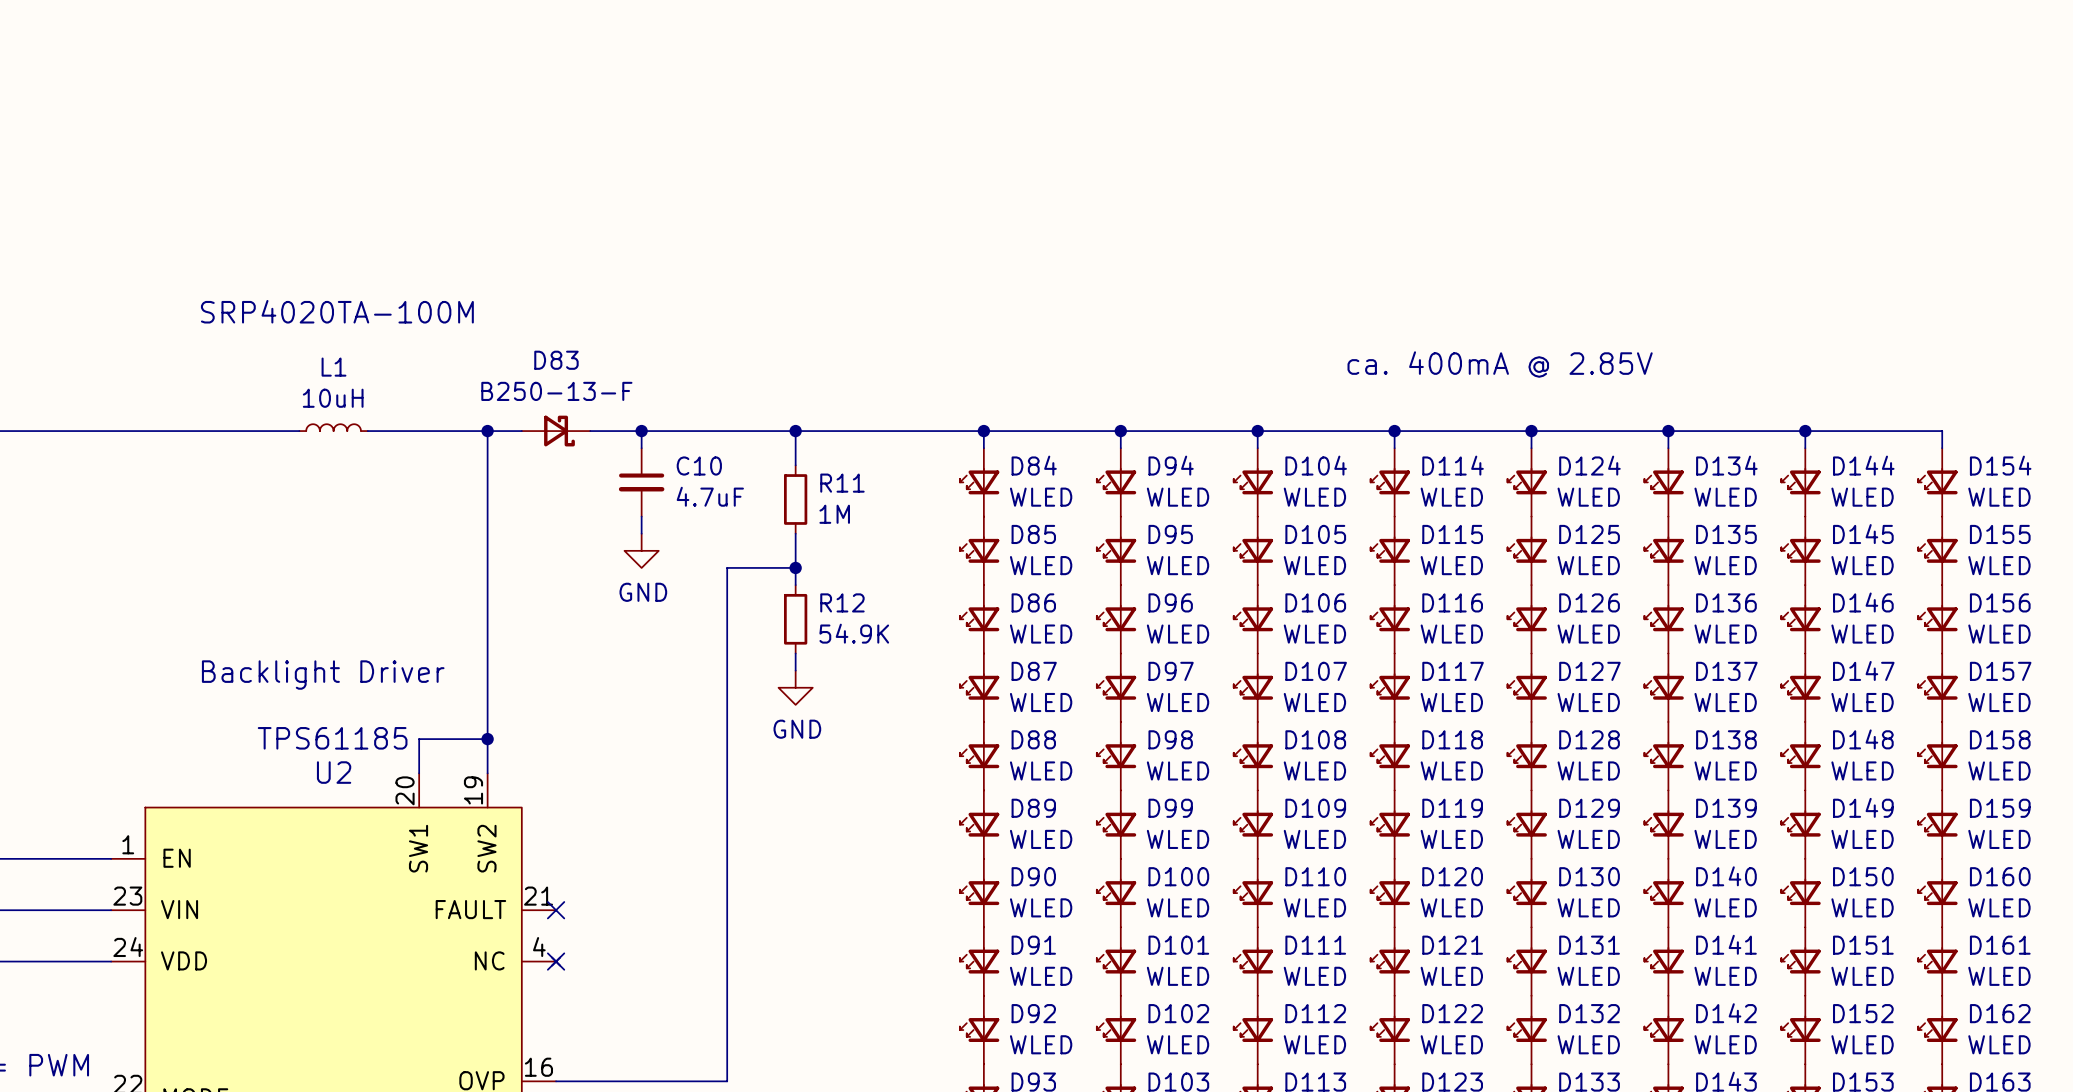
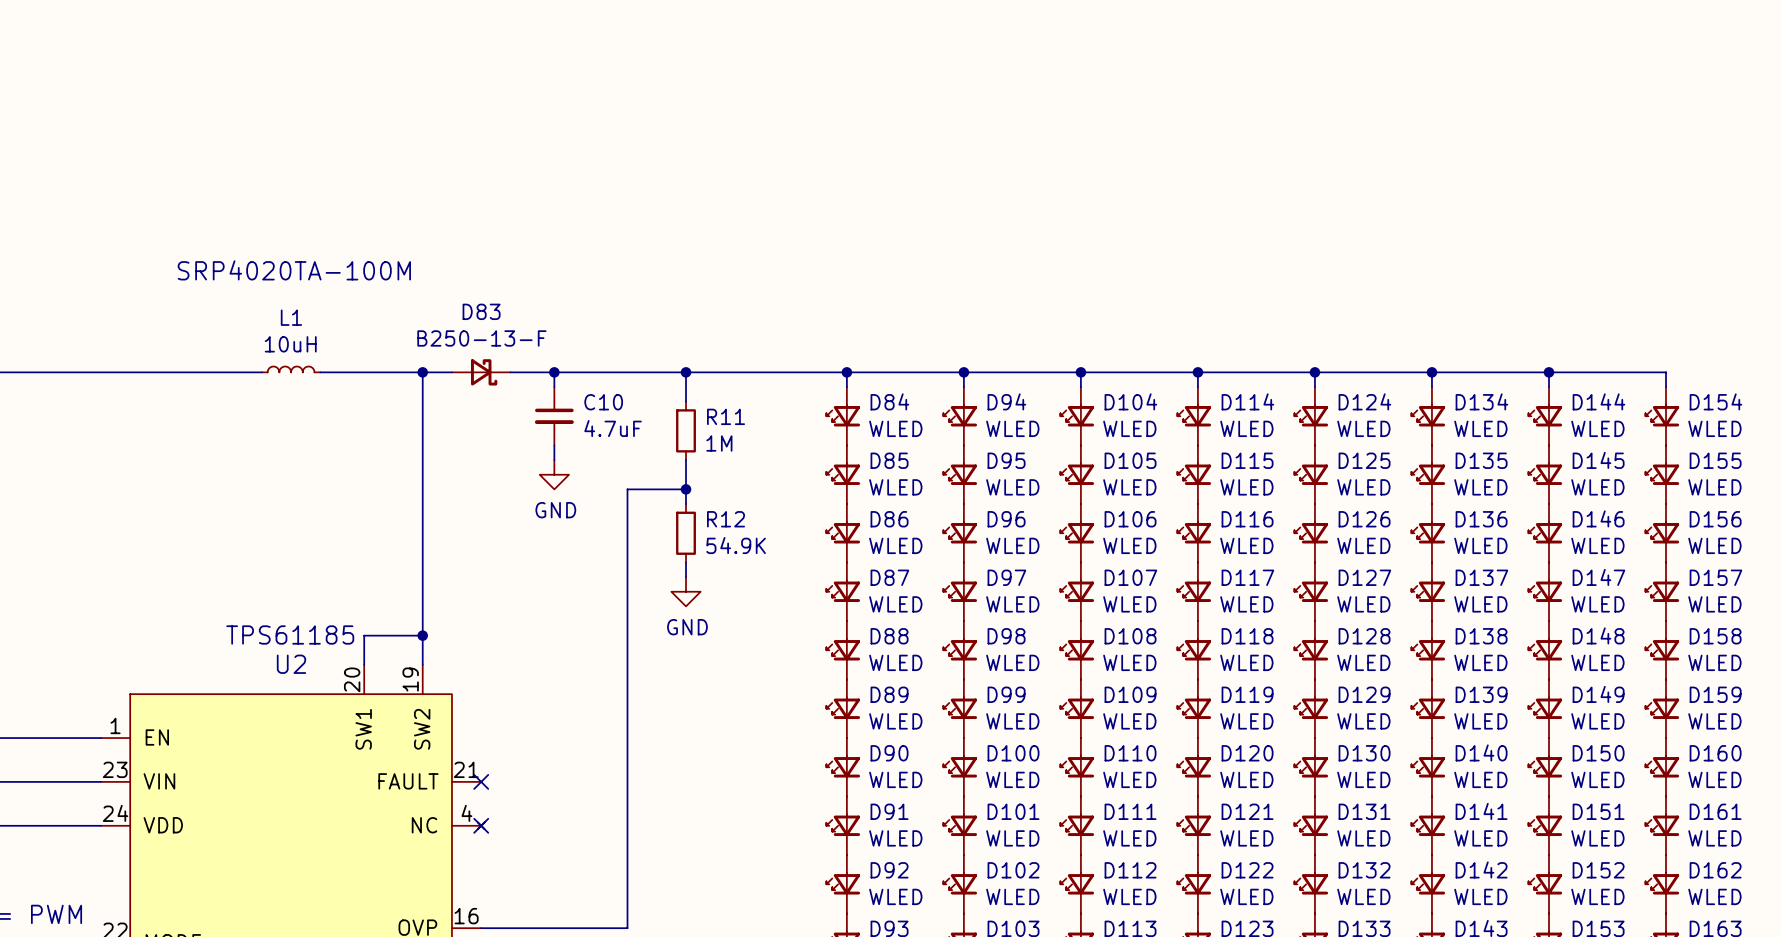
text: ca. 400mA @ 2.85V (1500, 364) -> none
text: Backlight Driver (323, 675) -> none

